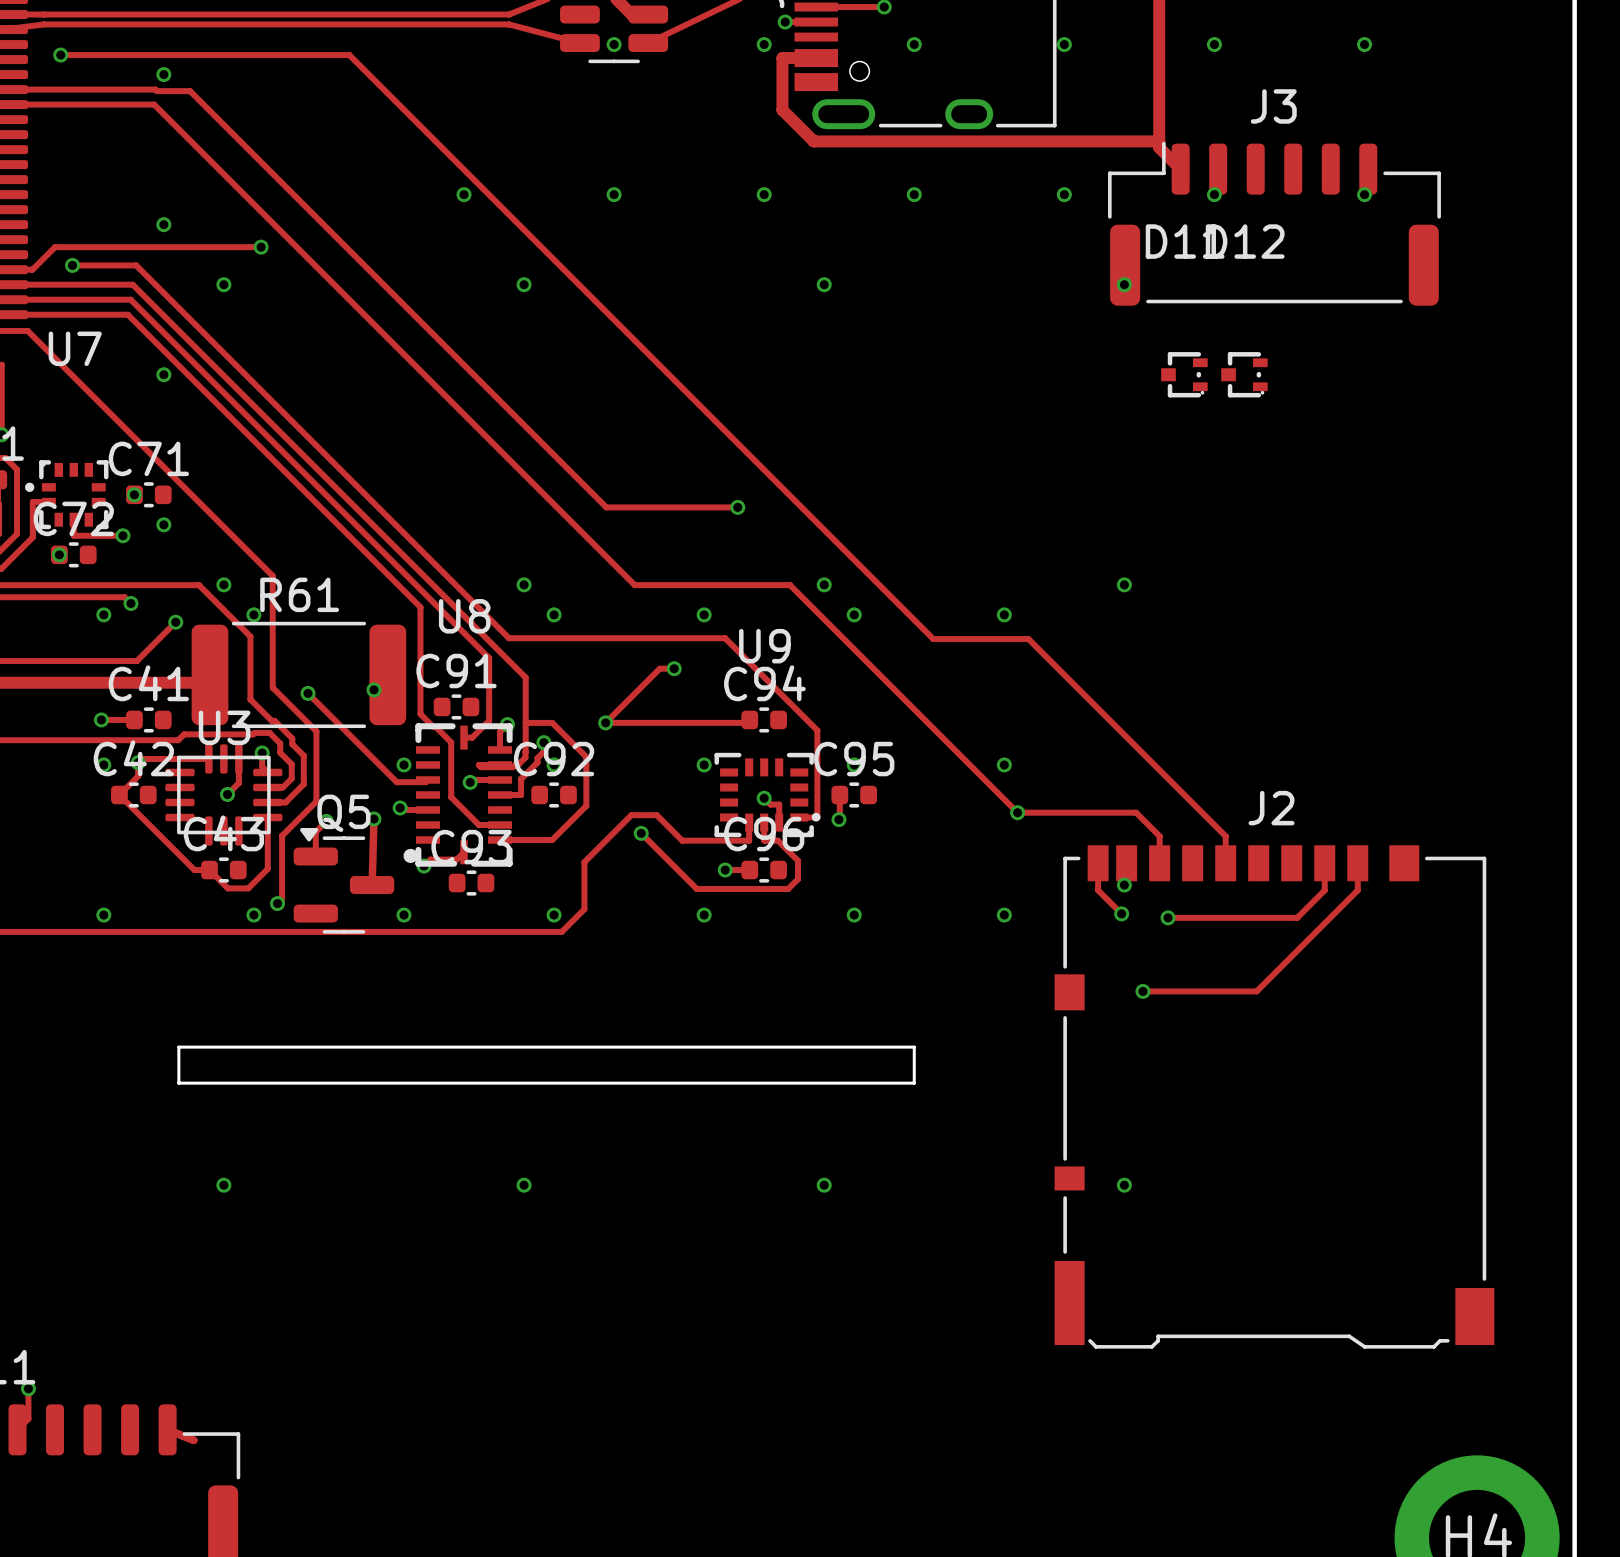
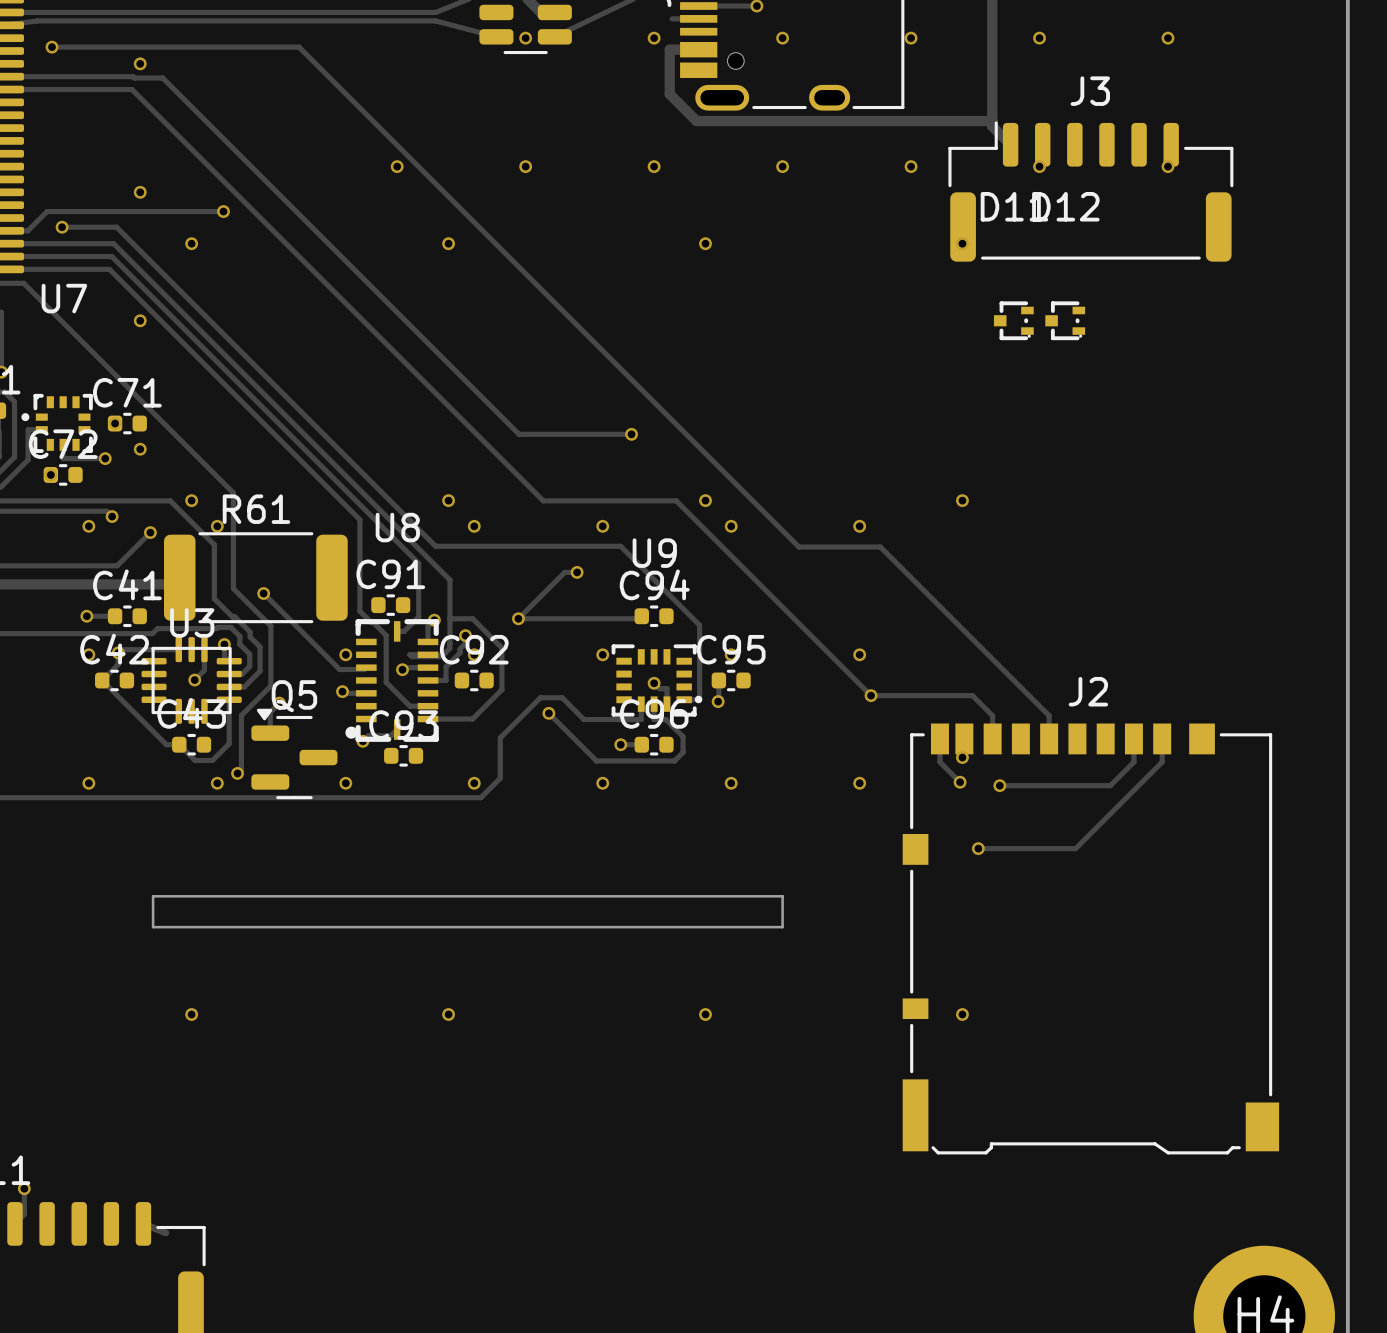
via: (785, 22) -> none
via: (373, 689) -> none
track: (373, 819) (372, 885) -> none
via: (373, 819) -> none

